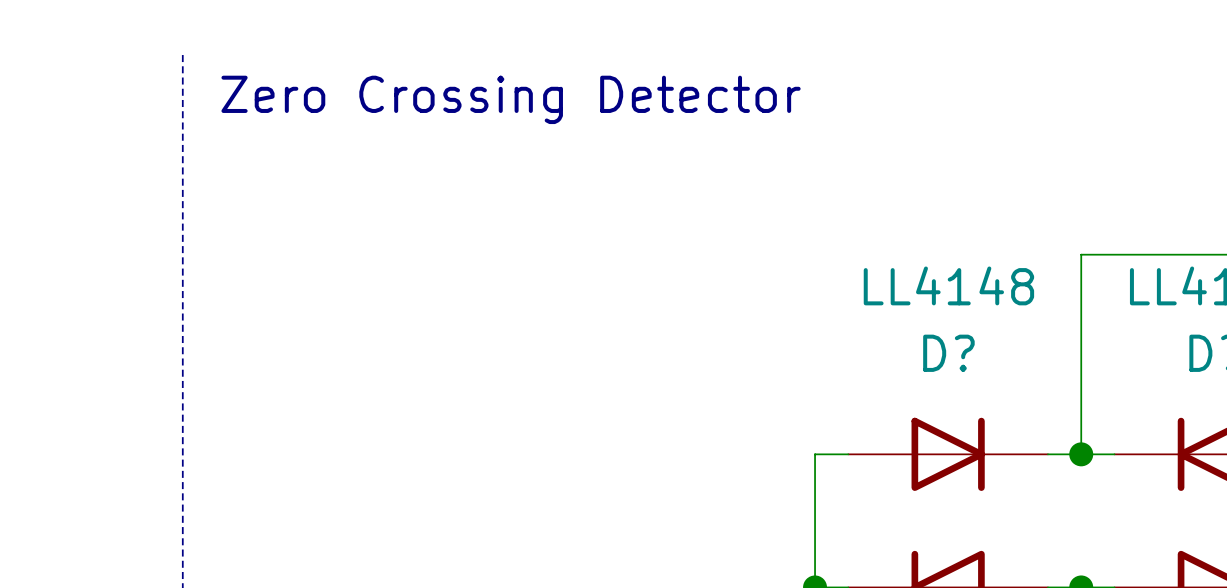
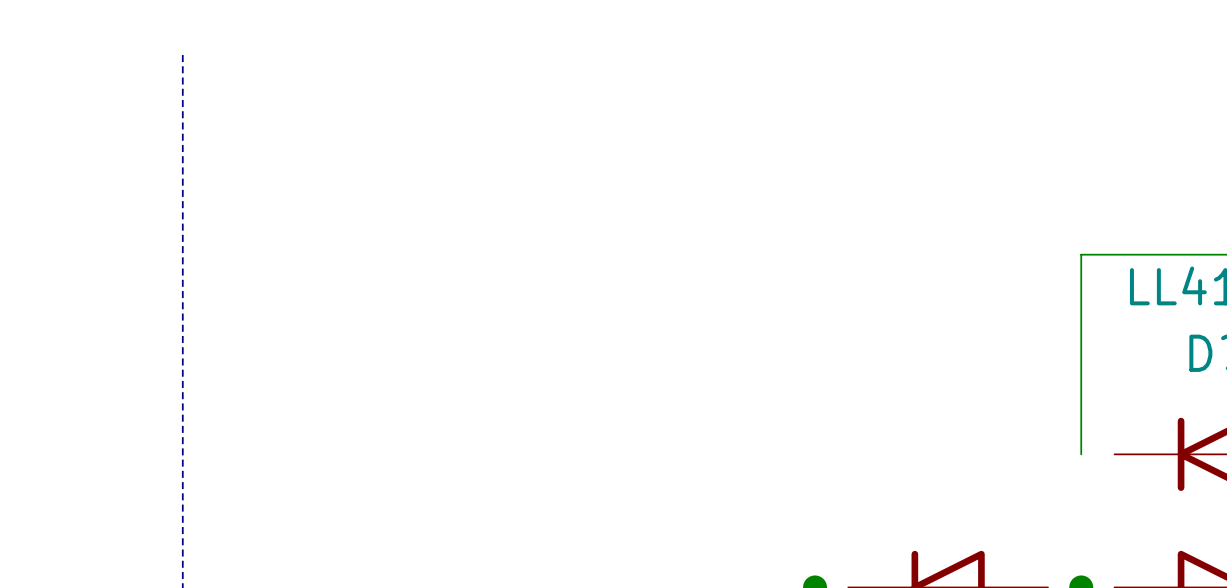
text: Zero Crossing Detector (511, 99) -> none
wire: (848, 454) (815, 454) (815, 587) (848, 587) -> none
D?: LL4148 (948, 454) -> none
wire: (1047, 454) (1114, 454) -> none
junction: (1081, 454) -> none
wire: (1047, 587) (1114, 587) -> none

